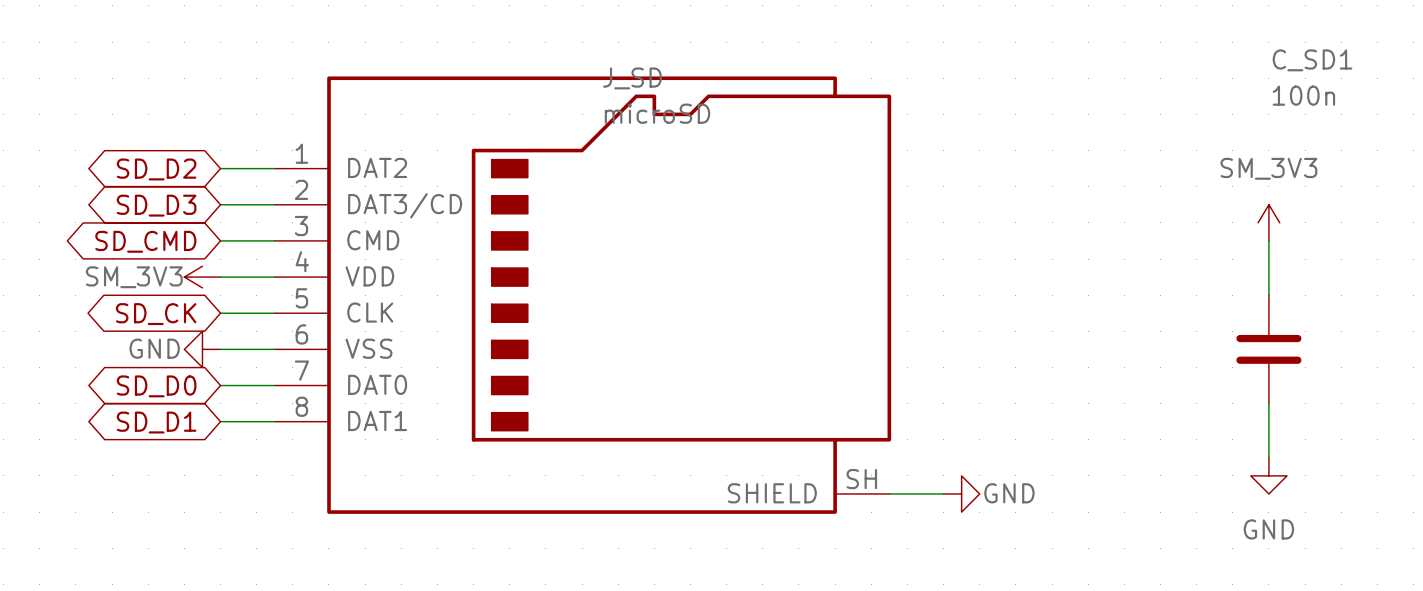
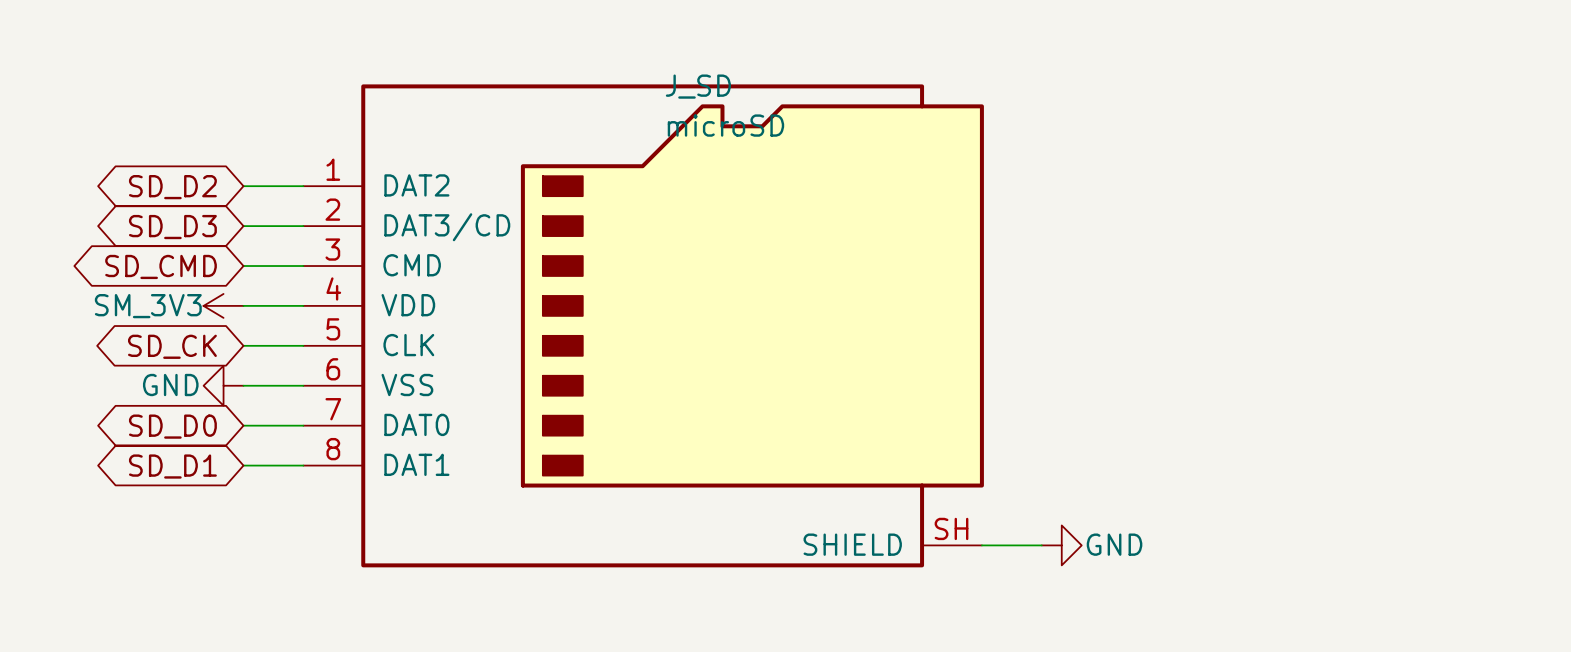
power symbol: SM_3V3 (1268, 222) -> none
wire: (1268, 240) (1268, 295) -> none
C_SD1: 100n (1268, 349) -> none
wire: (1268, 403) (1268, 457) -> none
power symbol: GND (1268, 475) -> none

